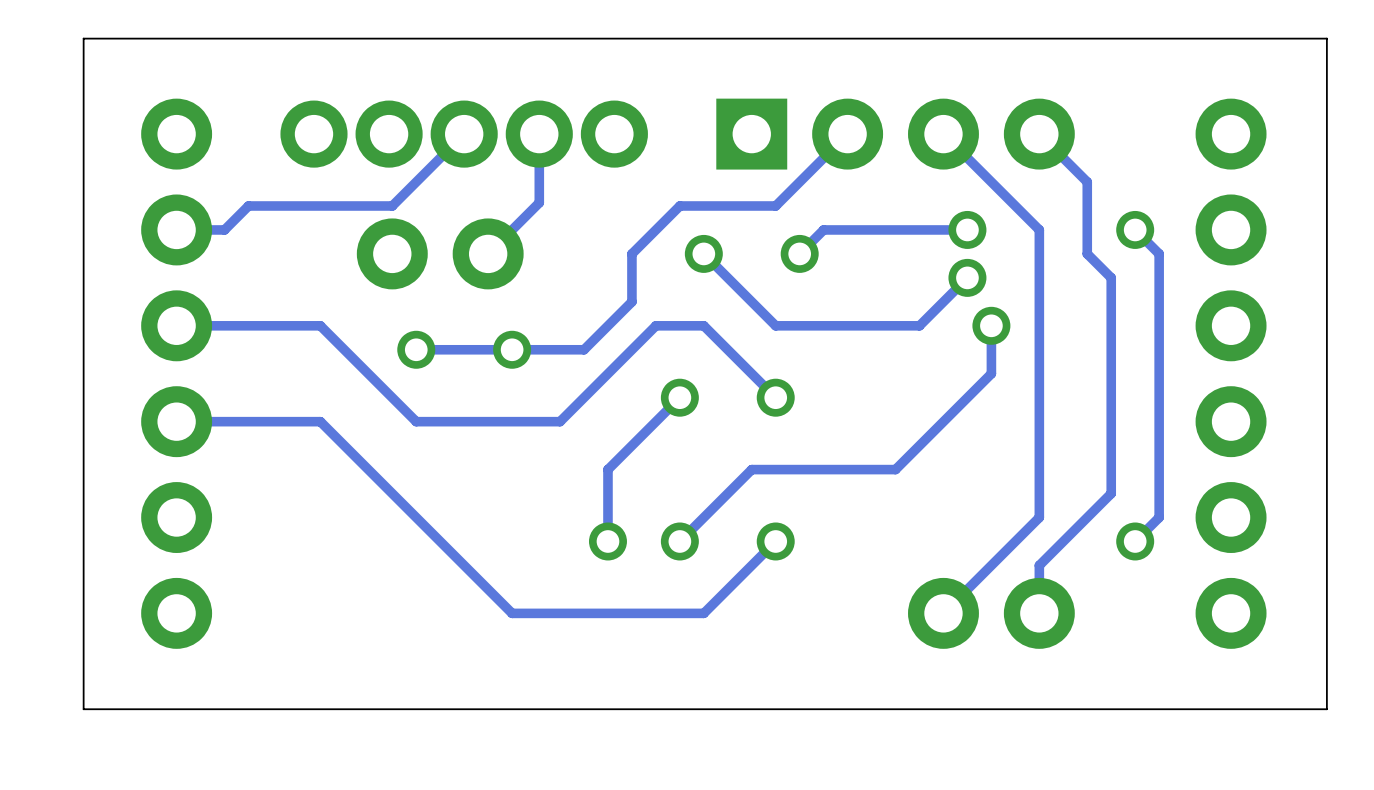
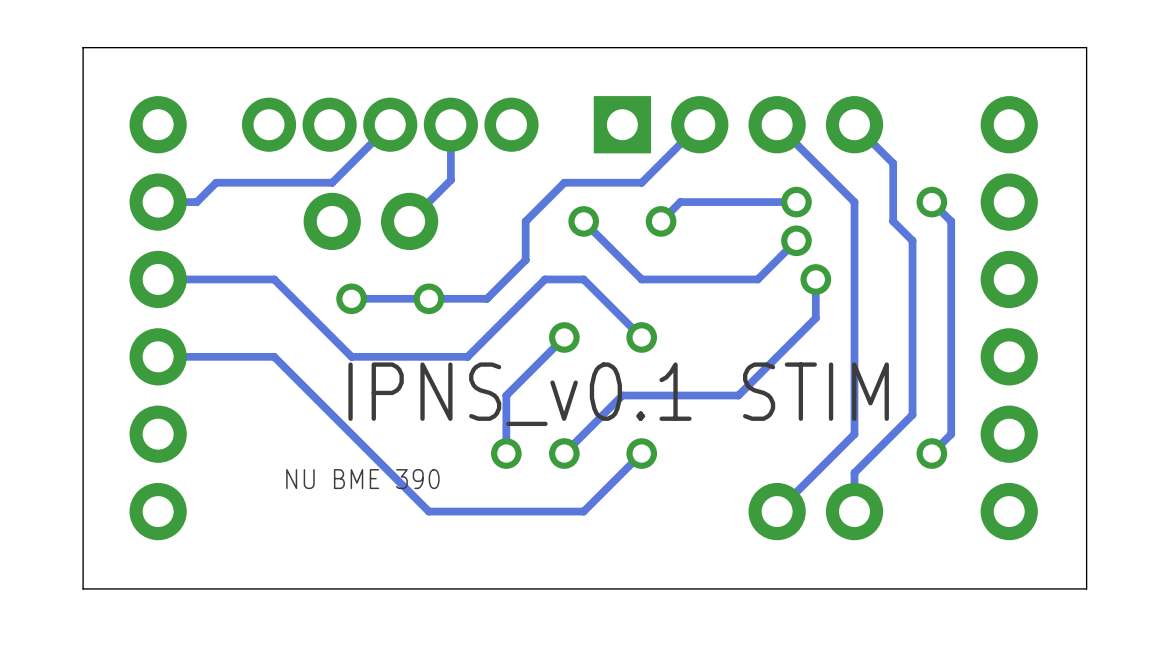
text: none -> IPNS_v0.1 STIM (618, 394)
text: none -> NU BME 390 (362, 479)

